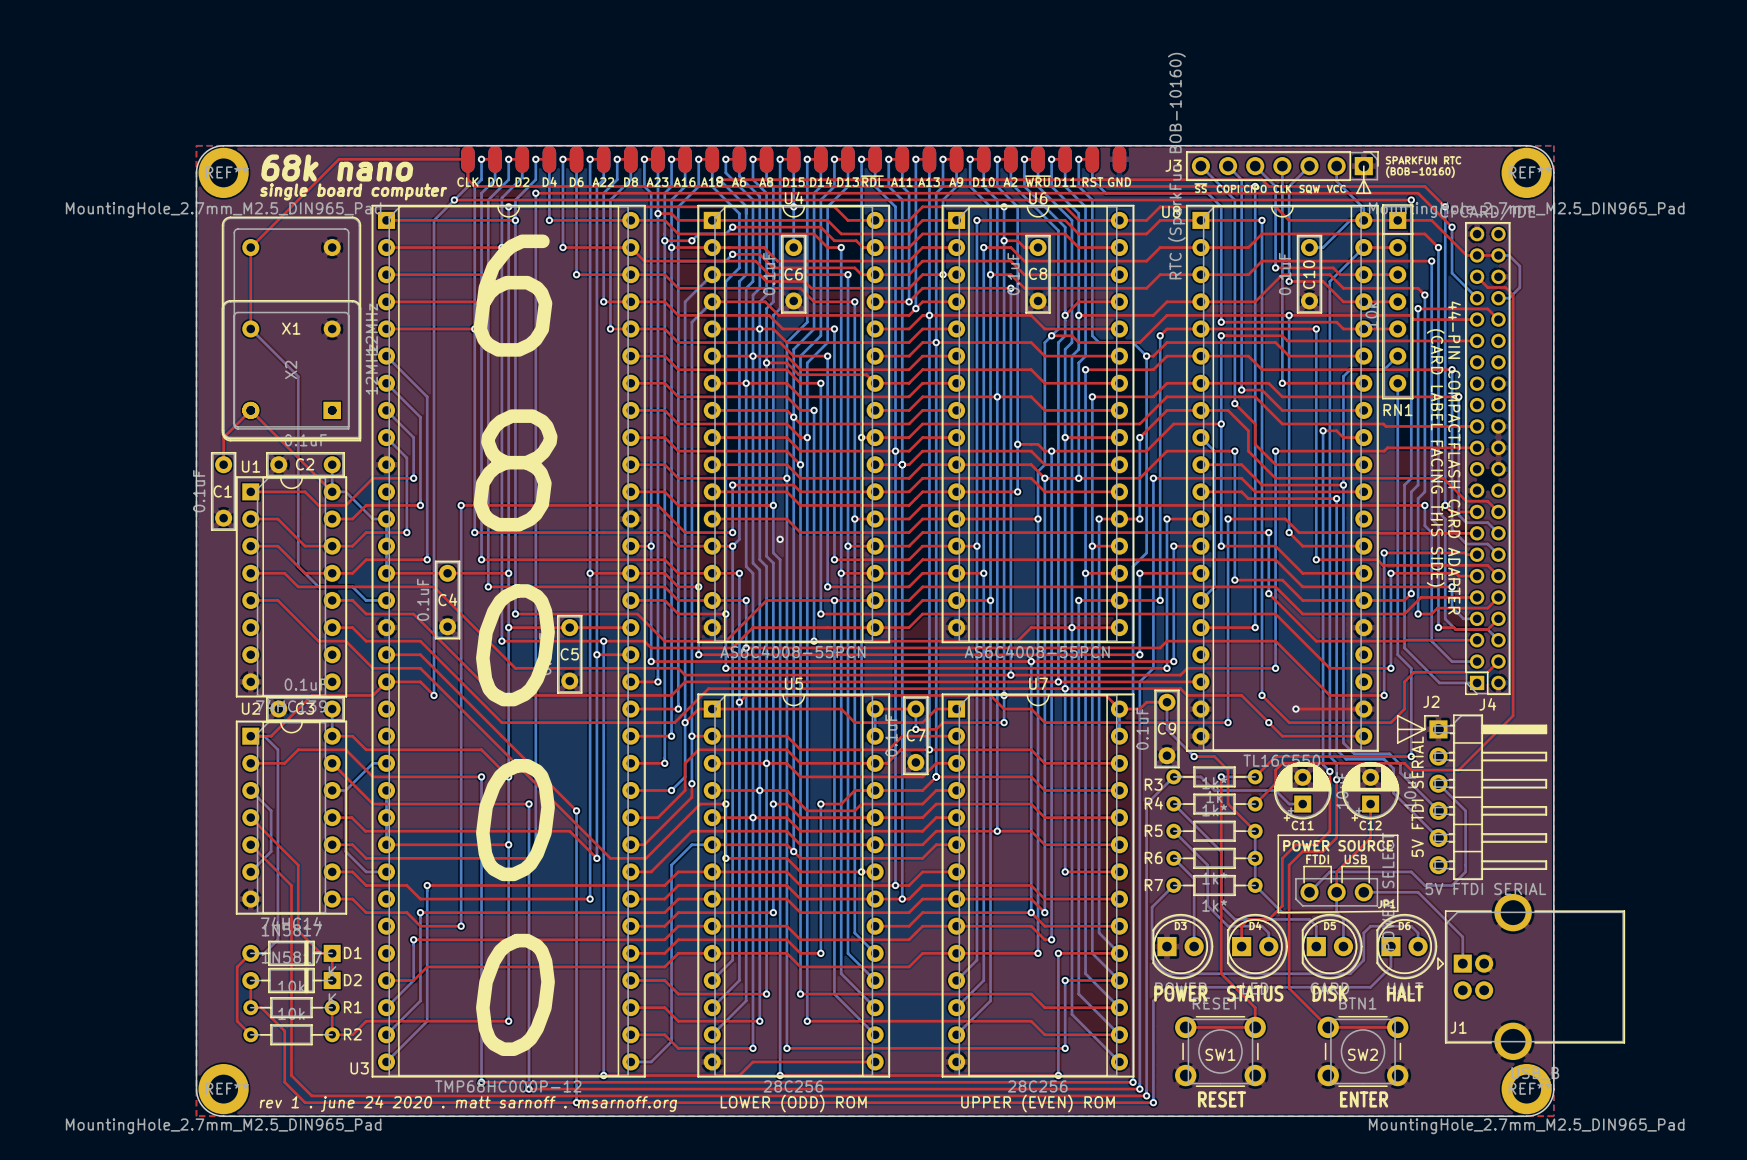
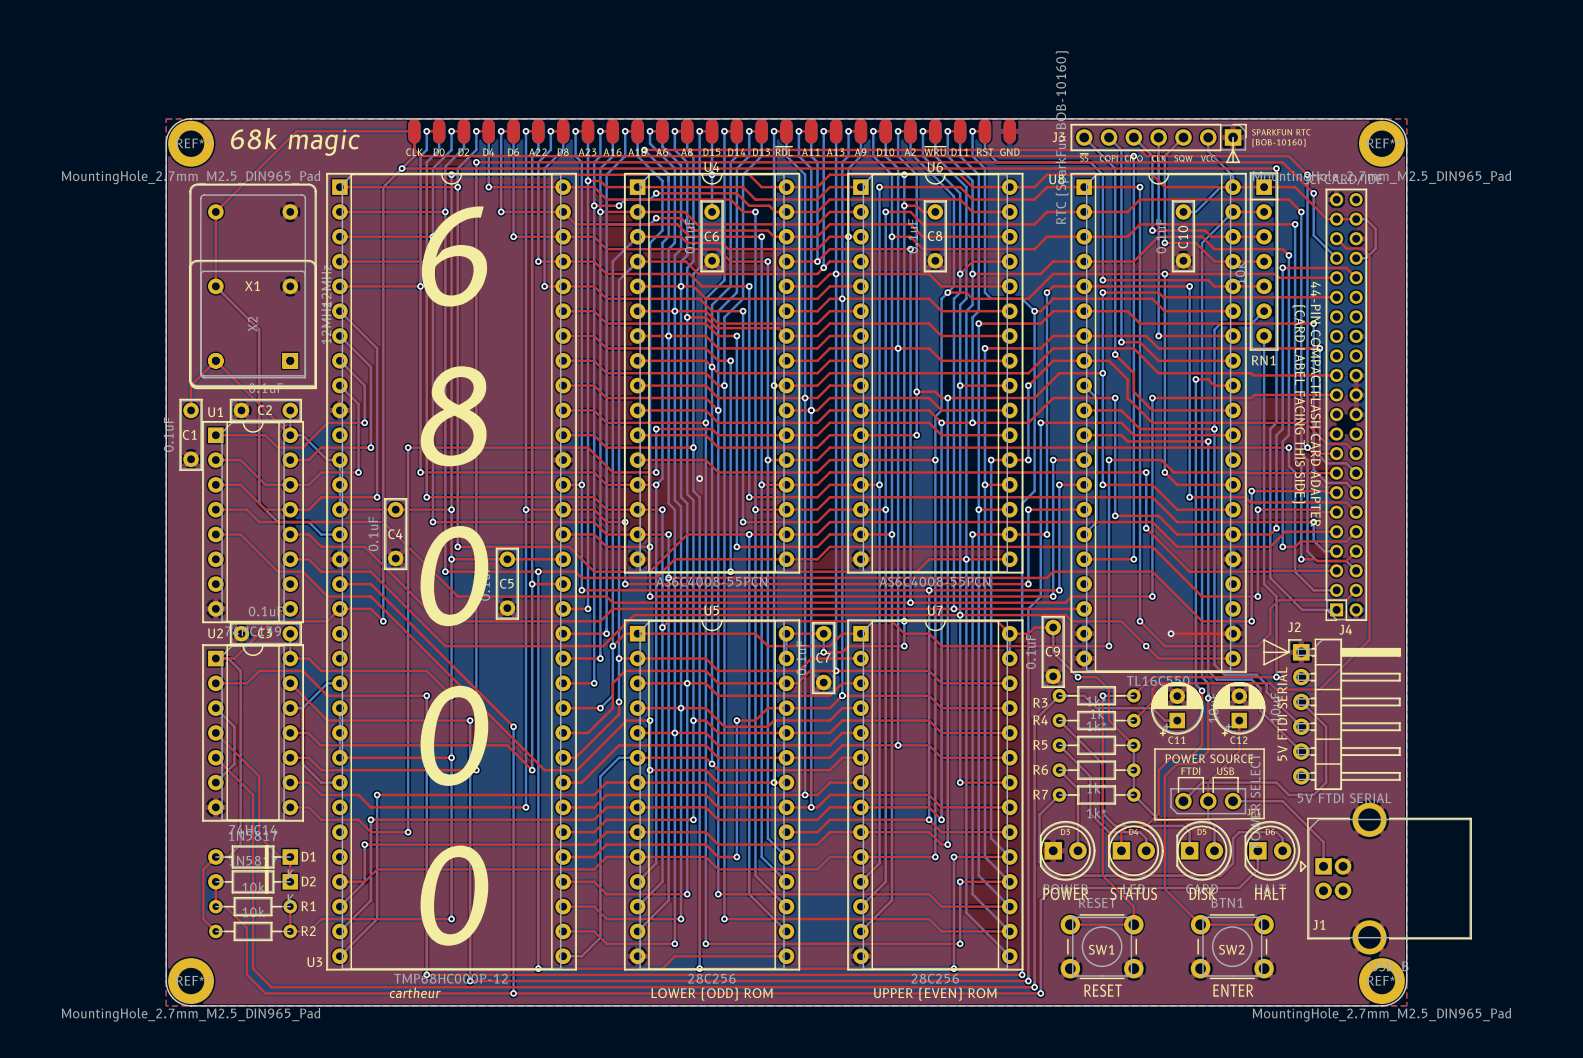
text: 68k nano (337, 168) -> 68k magic (295, 141)
text: single board computer (353, 191) -> none
text: rev 1 . june 24 2020 . matt sarnoff . msarnoff.org (468, 1103) -> cartheur (415, 992)

